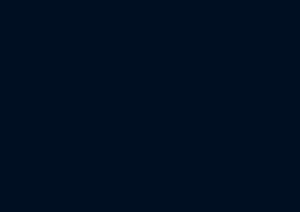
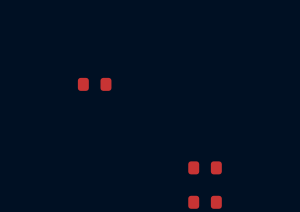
part: none -> (94, 84)
part: none -> (205, 167)
part: none -> (205, 202)

